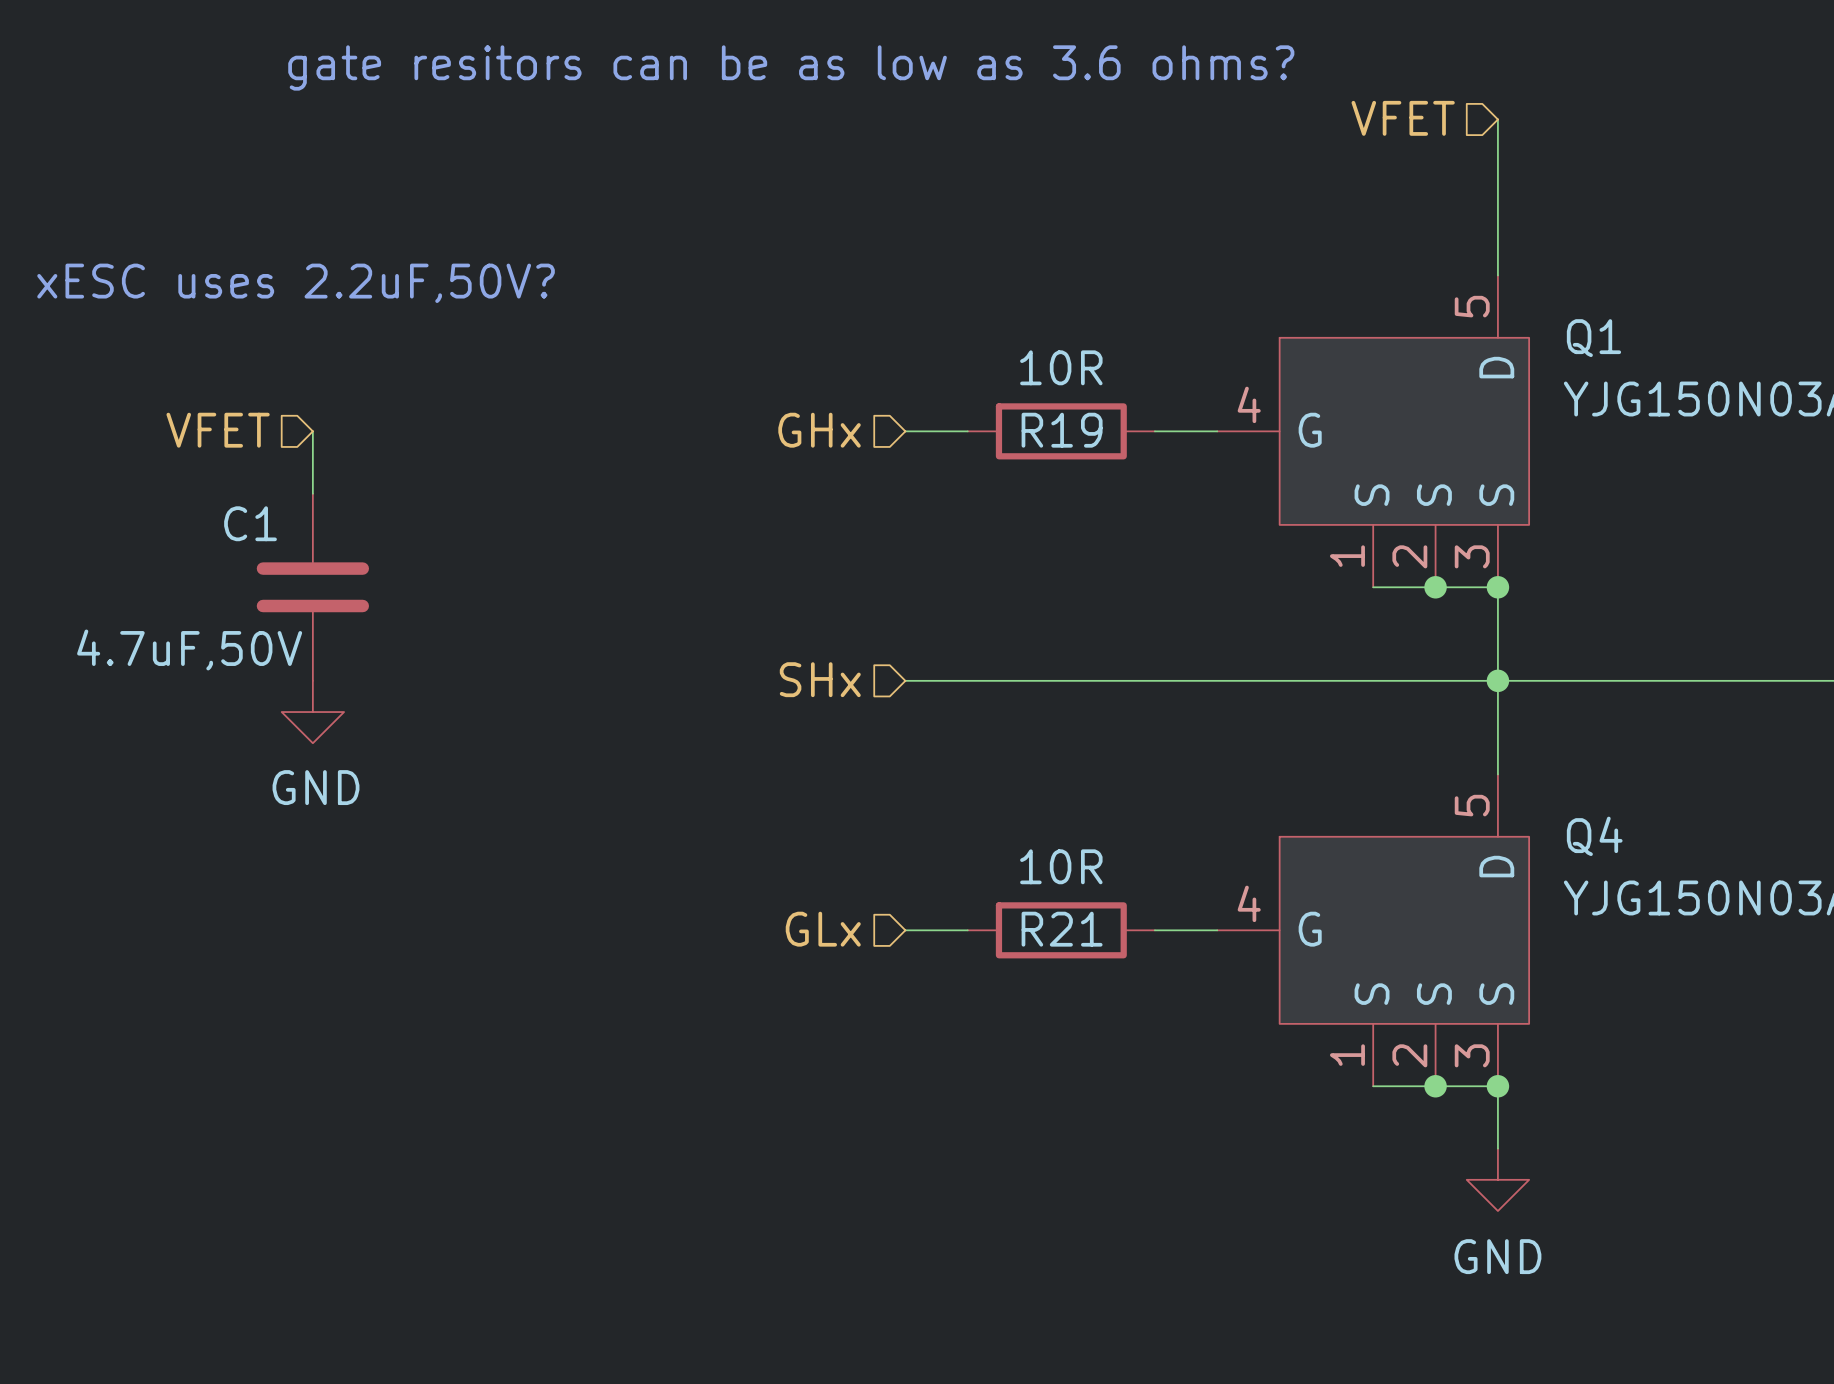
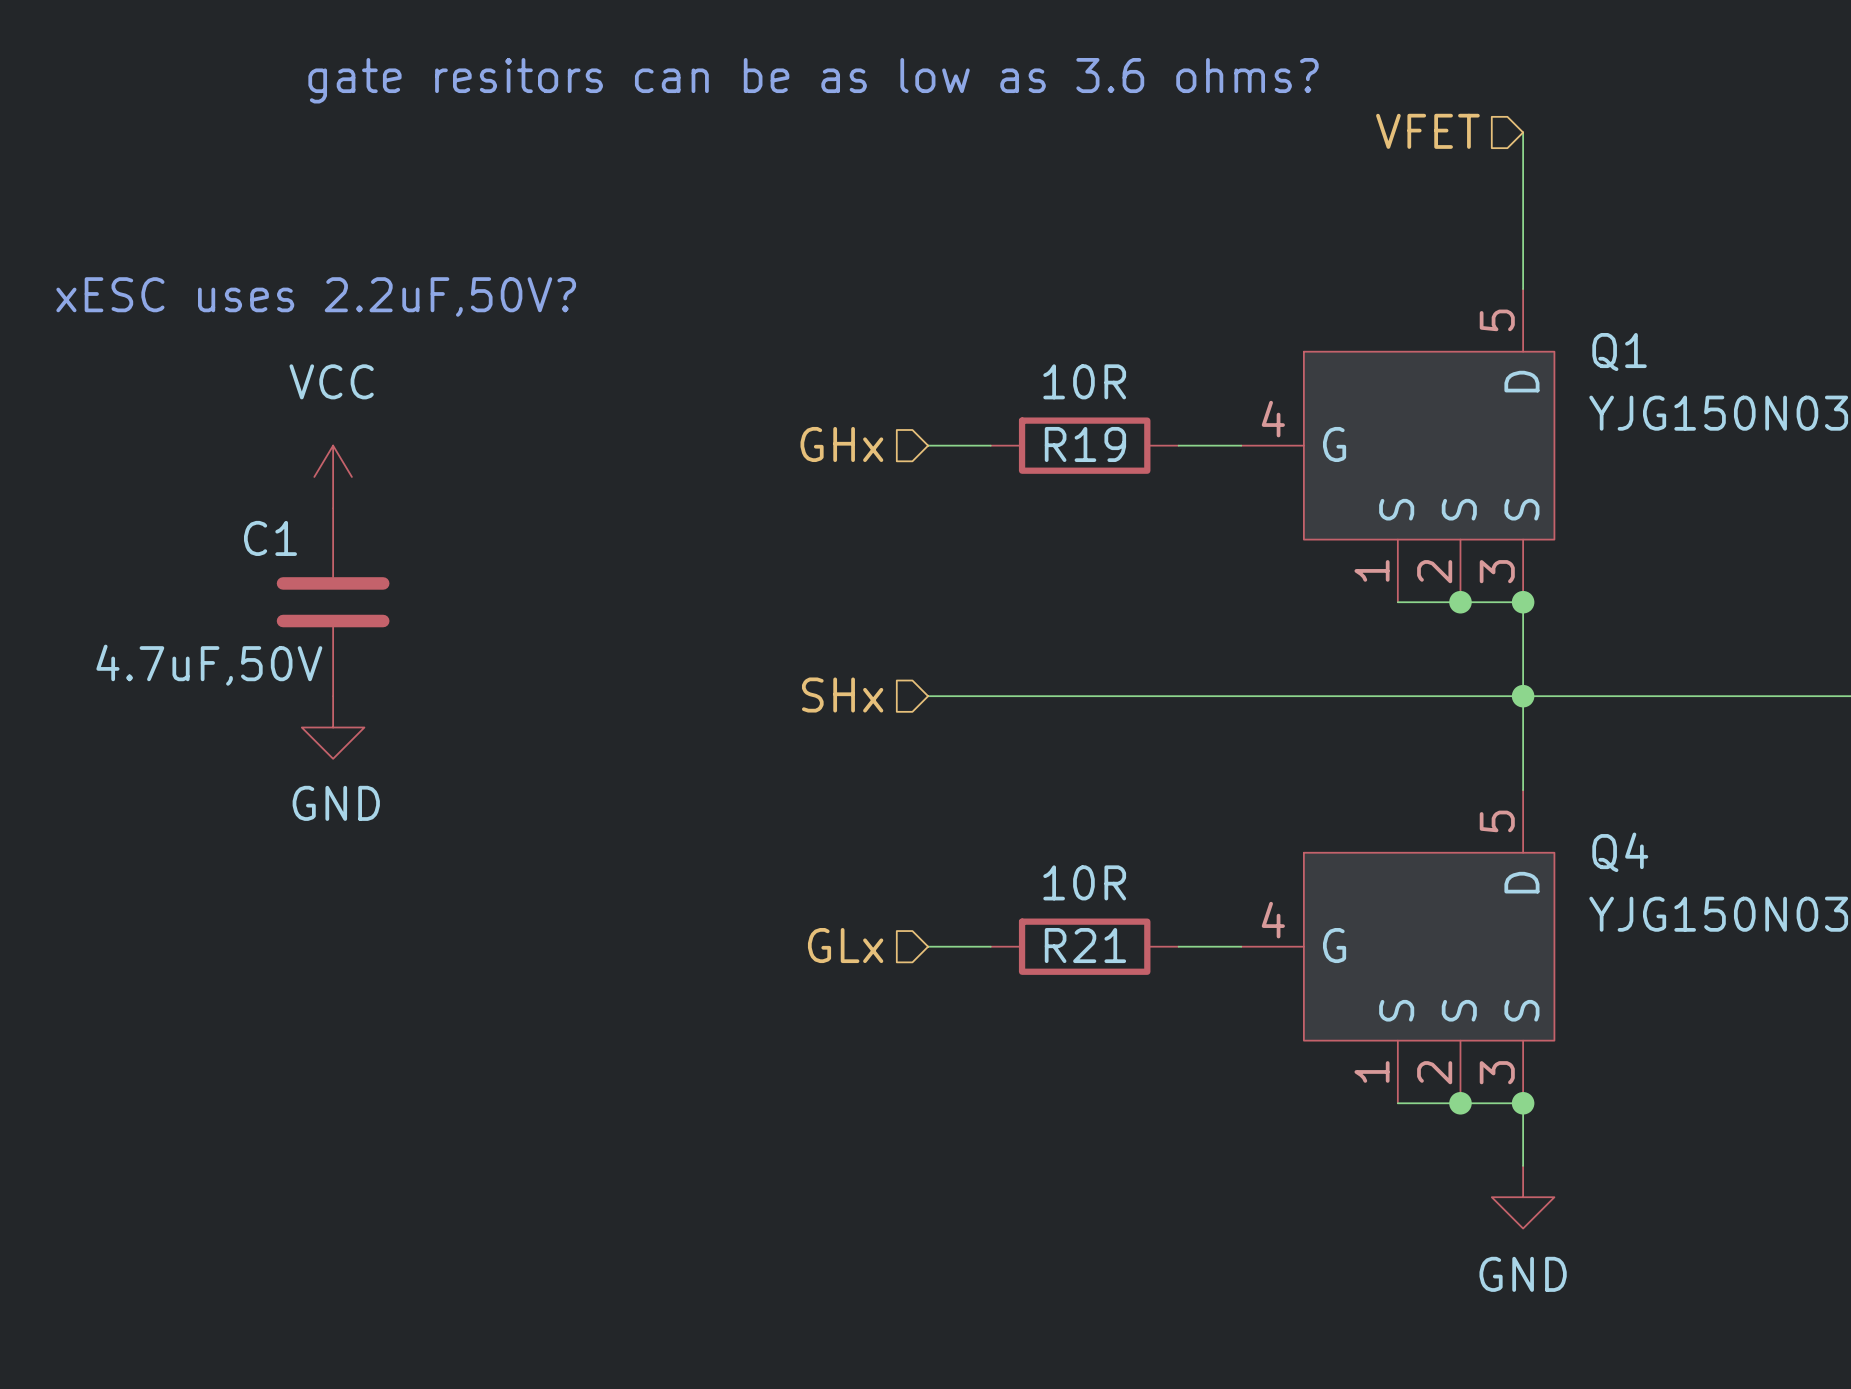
hierarchical label: VFET (218, 430) -> none
power symbol: none -> VCC (333, 476)

